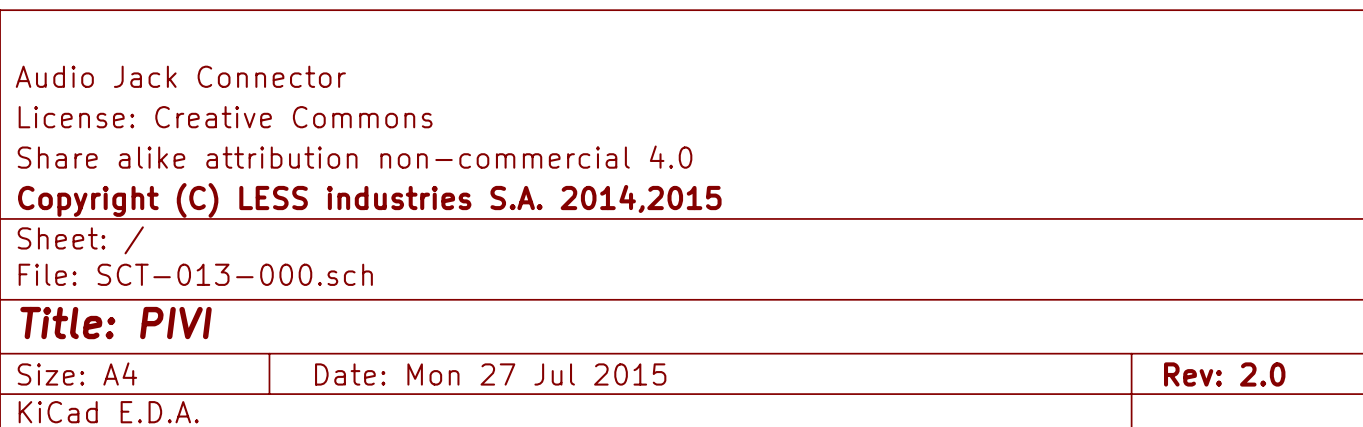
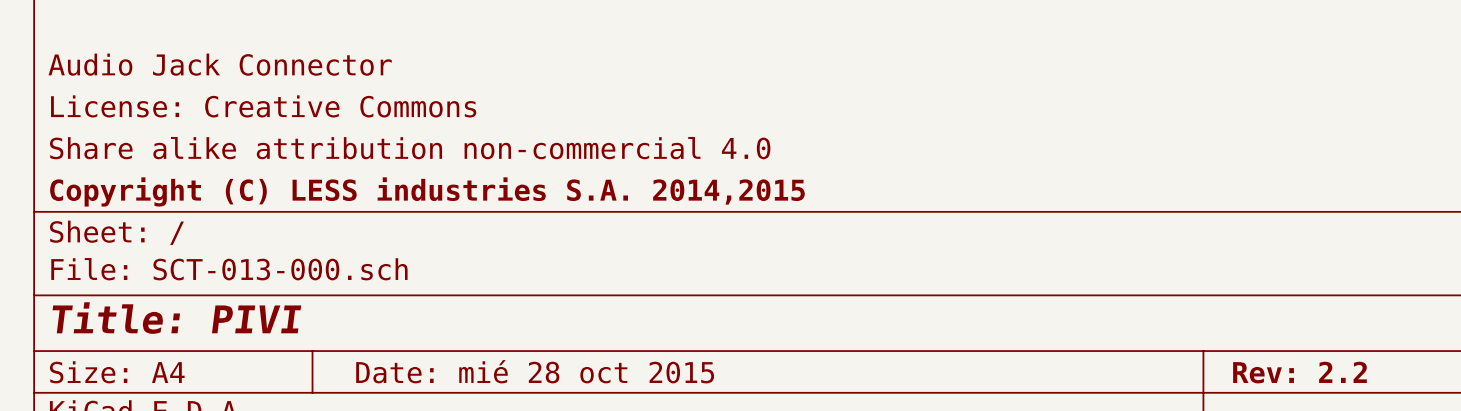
title block: Date: Mon 27 Jul 2015 (490, 374) -> Date: mié 28 oct 2015 (535, 371)
title block: Rev: 2.0 (1224, 374) -> Rev: 2.2 (1299, 372)

